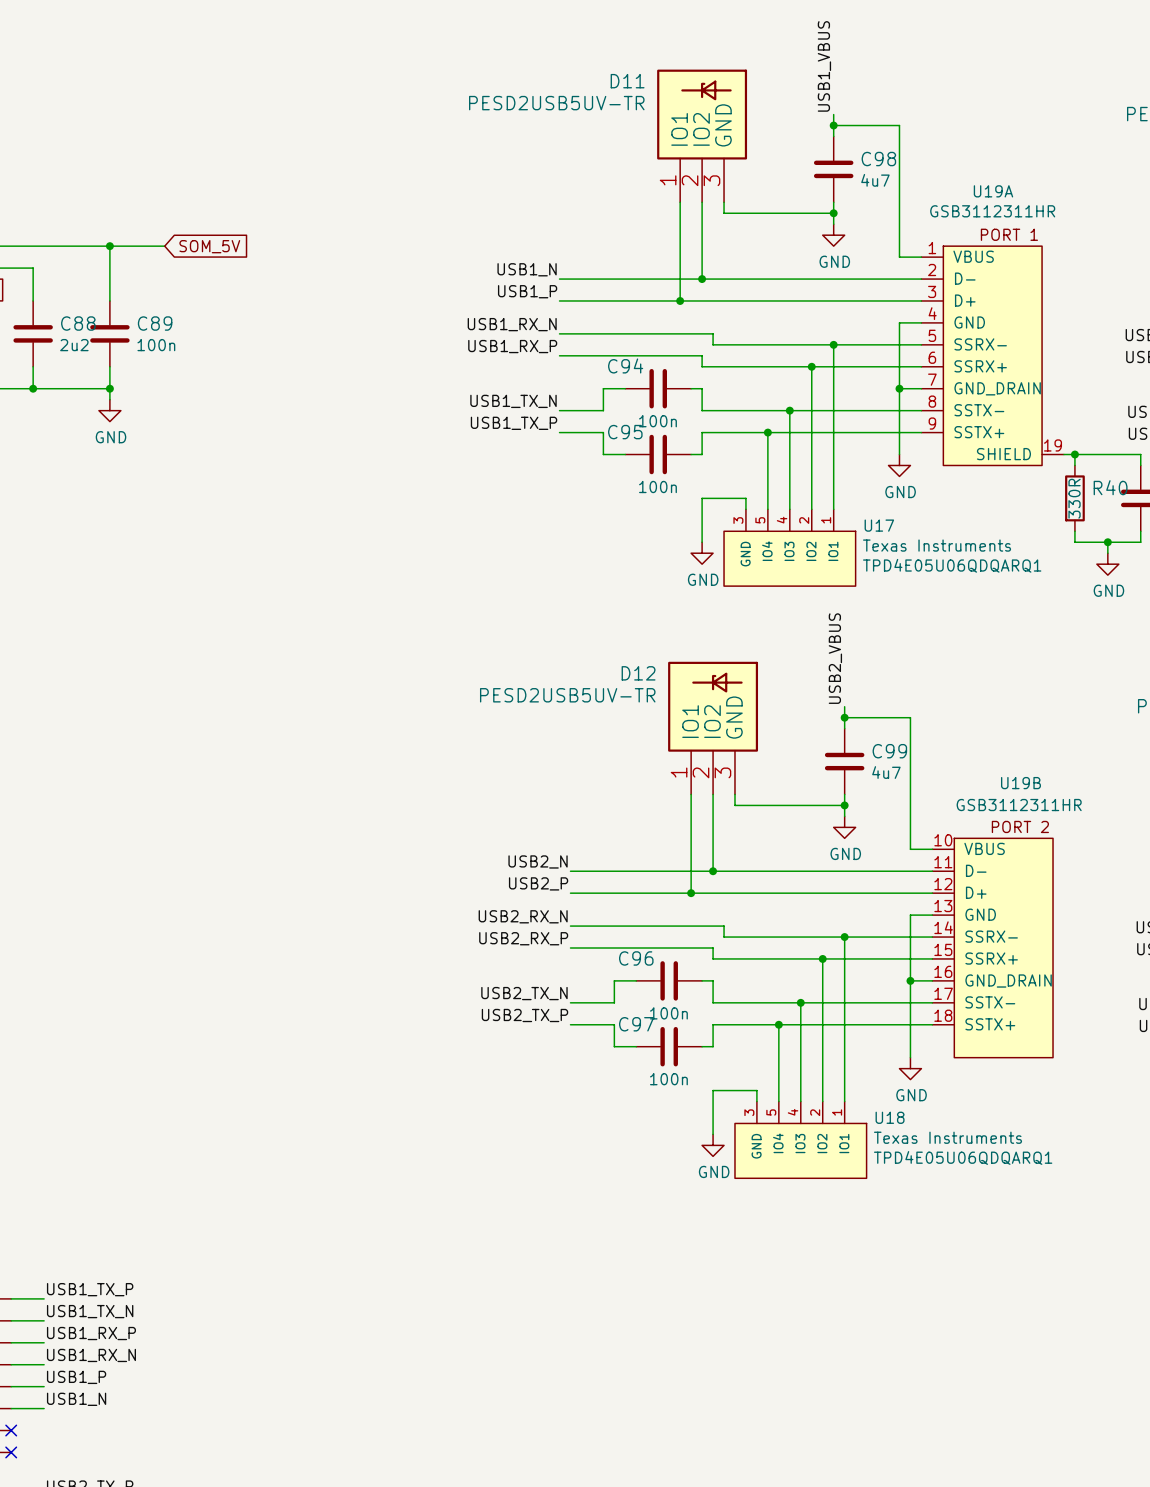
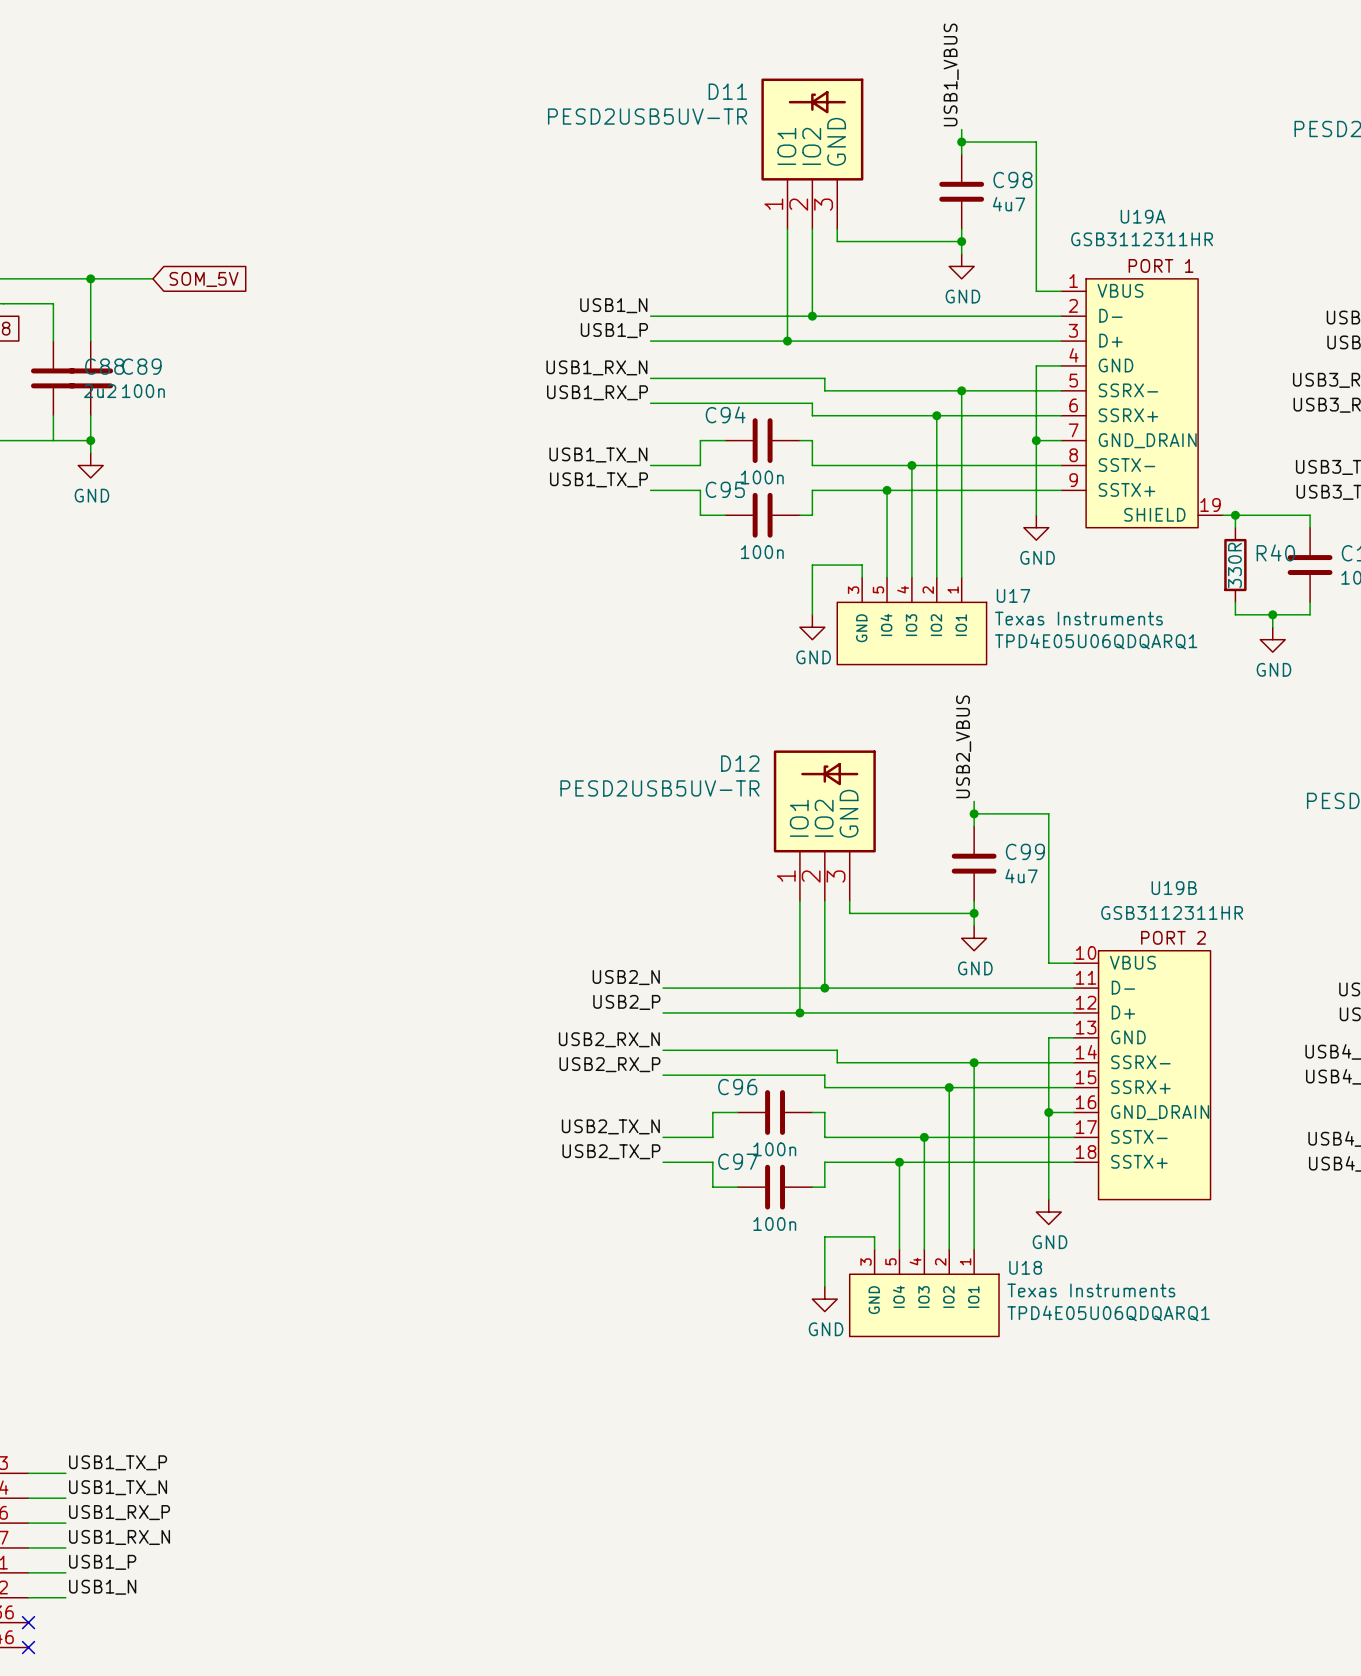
wire: (109, 246) (109, 300) -> (90, 278) (90, 341)
junction position: (109, 246) -> (90, 278)
wire: (120, 246) (164, 246) -> none
global label position: SOM_5V (209, 246) -> SOM_5V (204, 279)
C89 position: (109, 333) -> (90, 378)
wire: (109, 366) (109, 399) -> (90, 415) (90, 453)
junction: (33, 388) -> none
wire: (66, 388) (109, 388) -> none
junction: none -> (90, 440)
junction: (109, 388) -> none
power symbol position: GND (109, 410) -> GND (90, 465)

